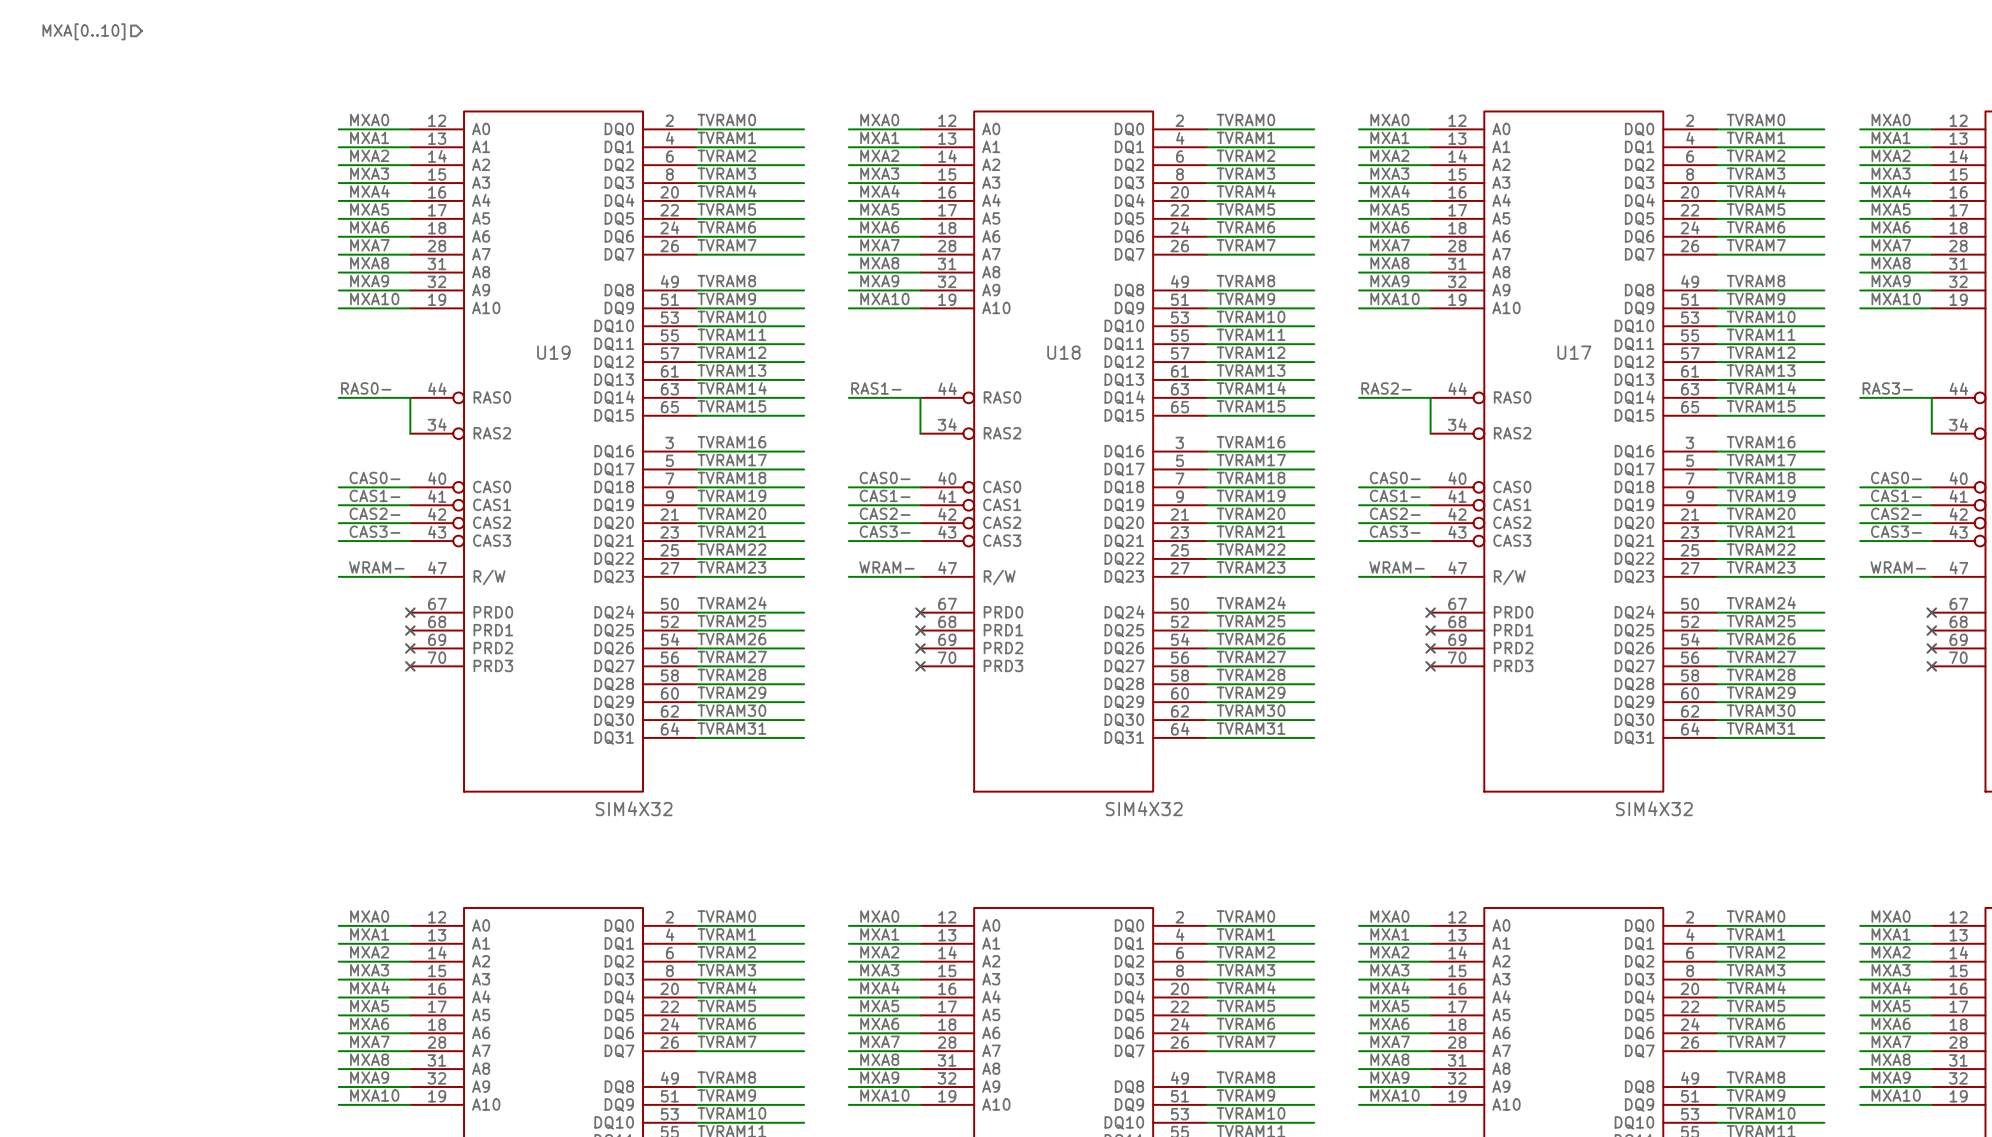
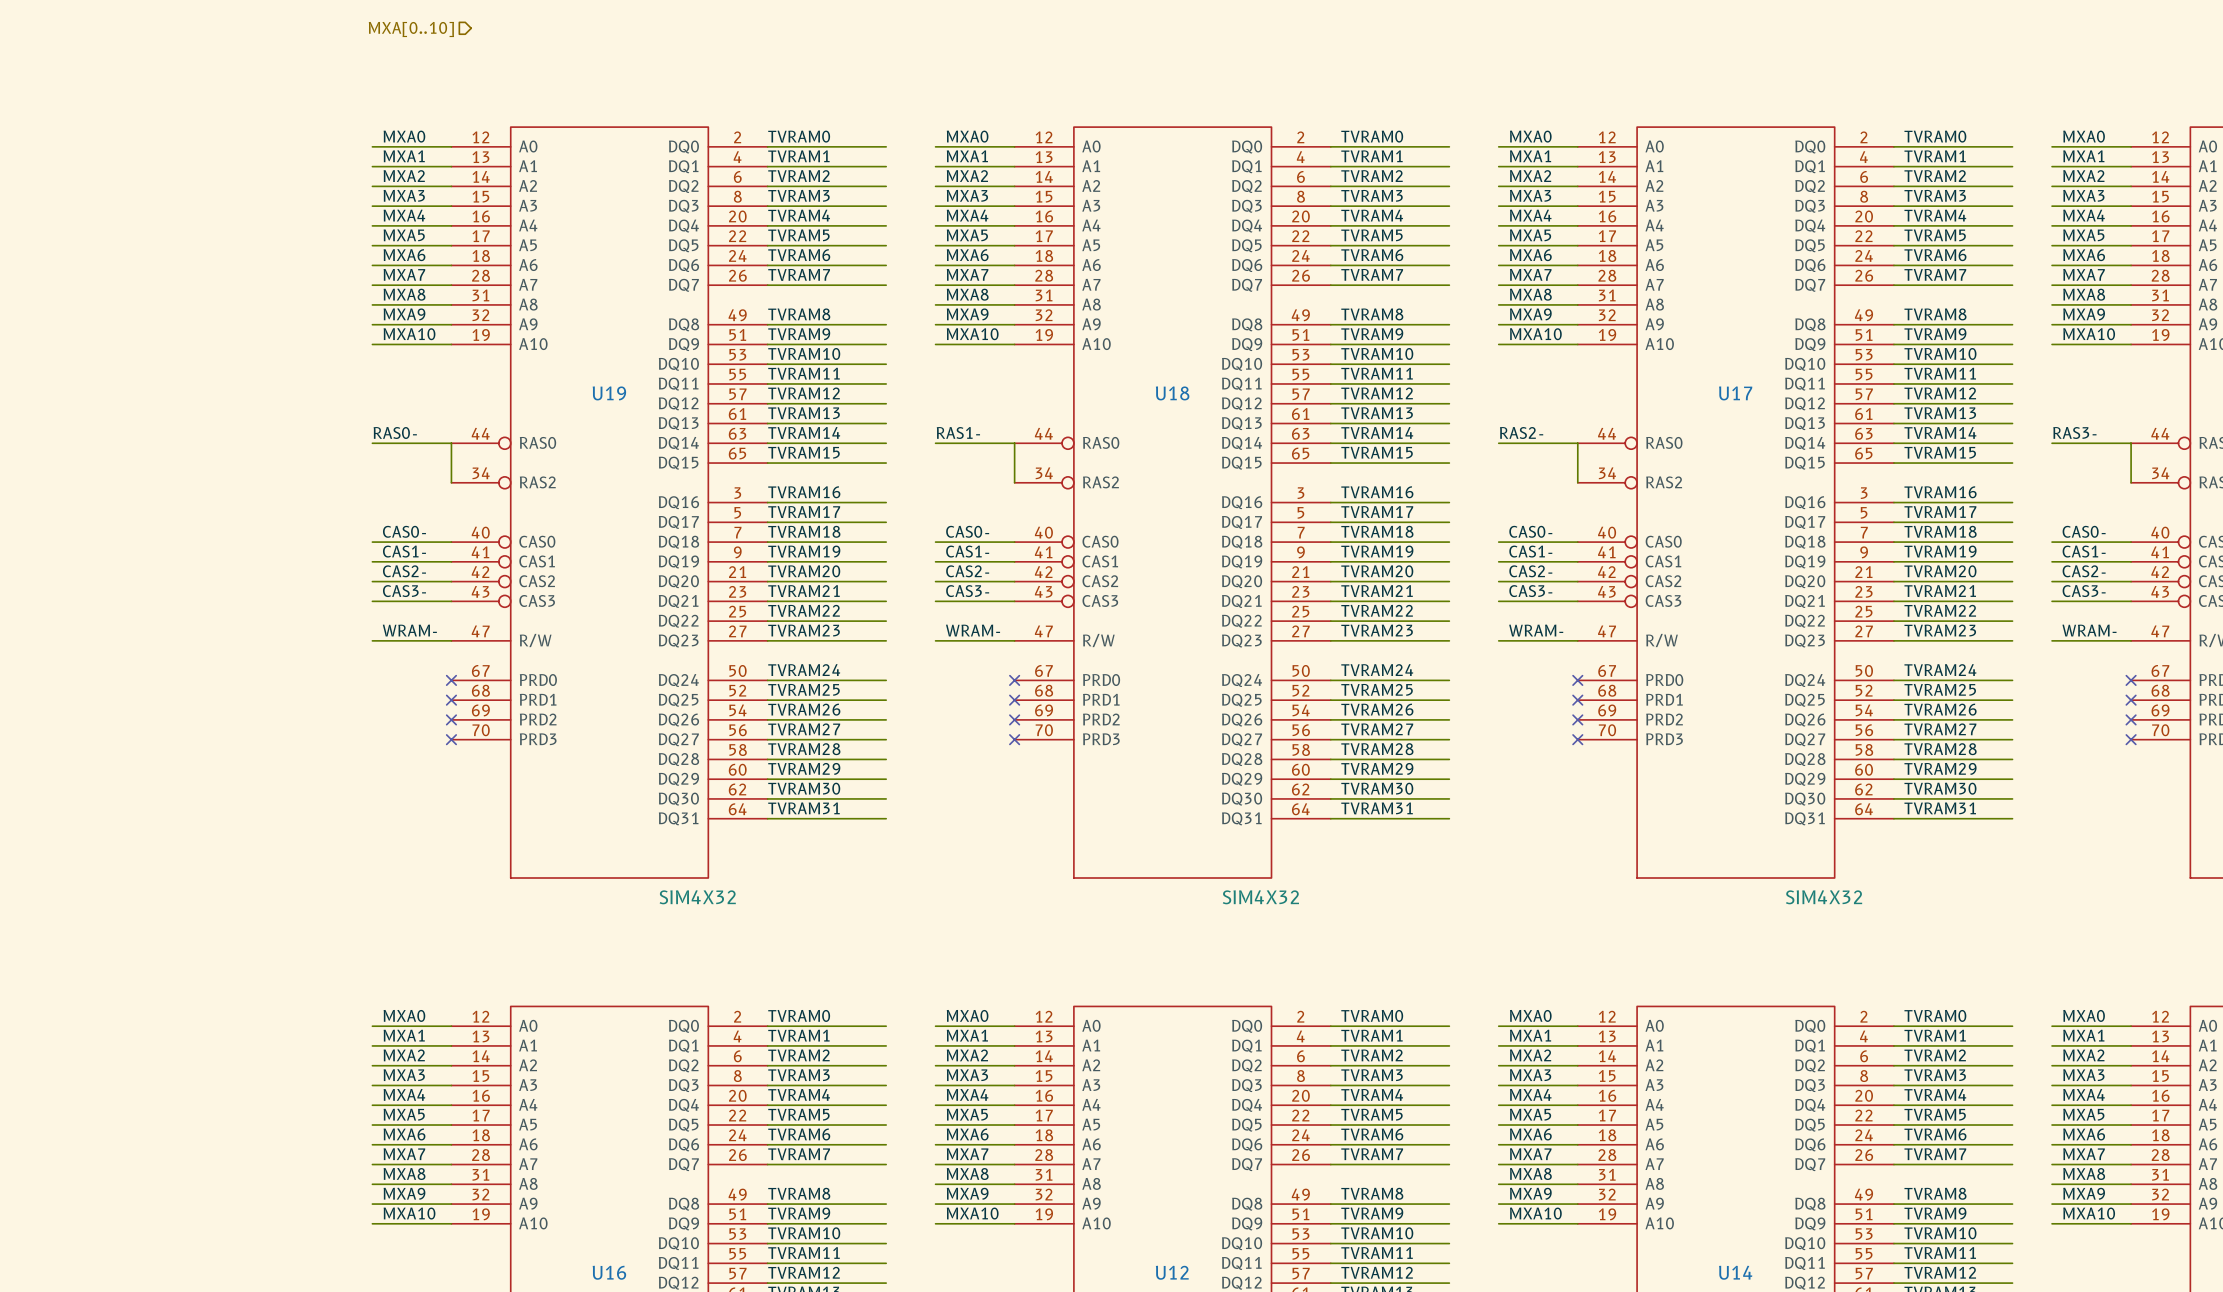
hierarchical label: none -> MXA[0..10] (411, 29)
hierarchical label: MXA[0..10] (83, 31) -> none

